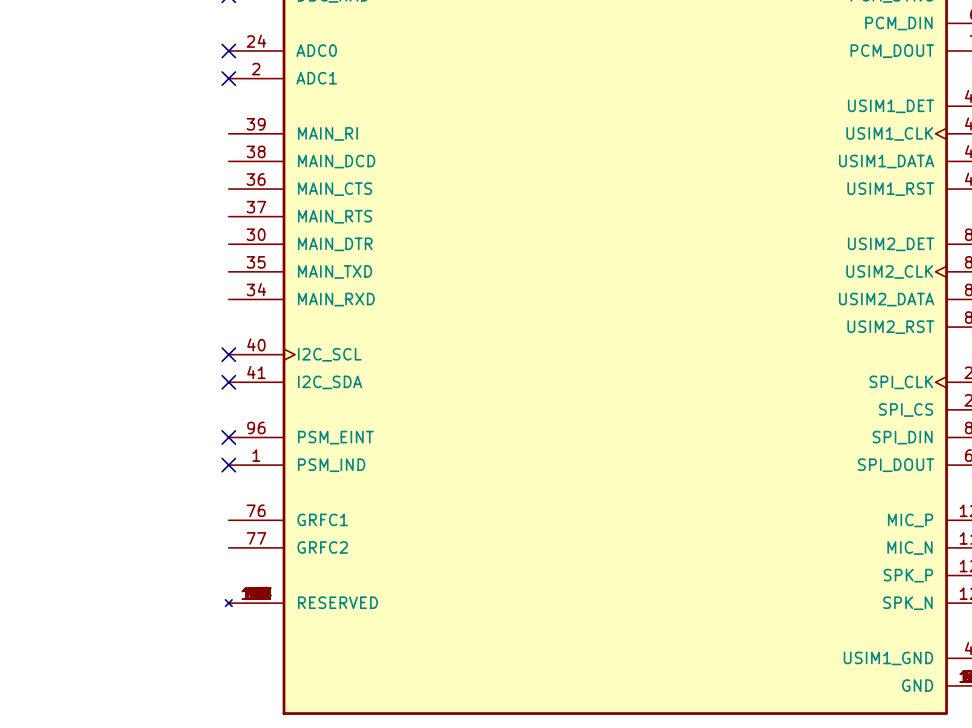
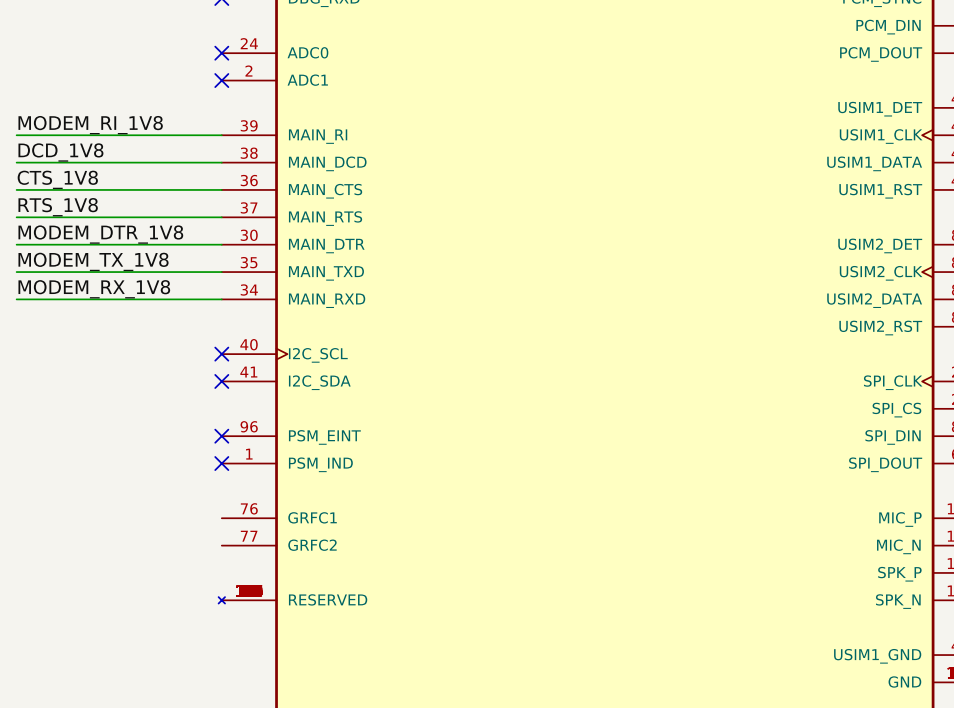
label: none -> MODEM_RI_1V8 (90, 125)
wire: none -> (16, 135) (221, 135)
label: none -> DCD_1V8 (60, 152)
wire: none -> (16, 162) (221, 162)
label: none -> CTS_1V8 (57, 179)
wire: none -> (16, 189) (221, 189)
label: none -> RTS_1V8 (58, 207)
wire: none -> (16, 217) (221, 217)
label: none -> MODEM_DTR_1V8 (100, 234)
wire: none -> (16, 244) (221, 244)
label: none -> MODEM_TX_1V8 (93, 261)
wire: none -> (16, 272) (221, 272)
label: none -> MODEM_RX_1V8 (94, 289)
wire: none -> (16, 299) (221, 299)

